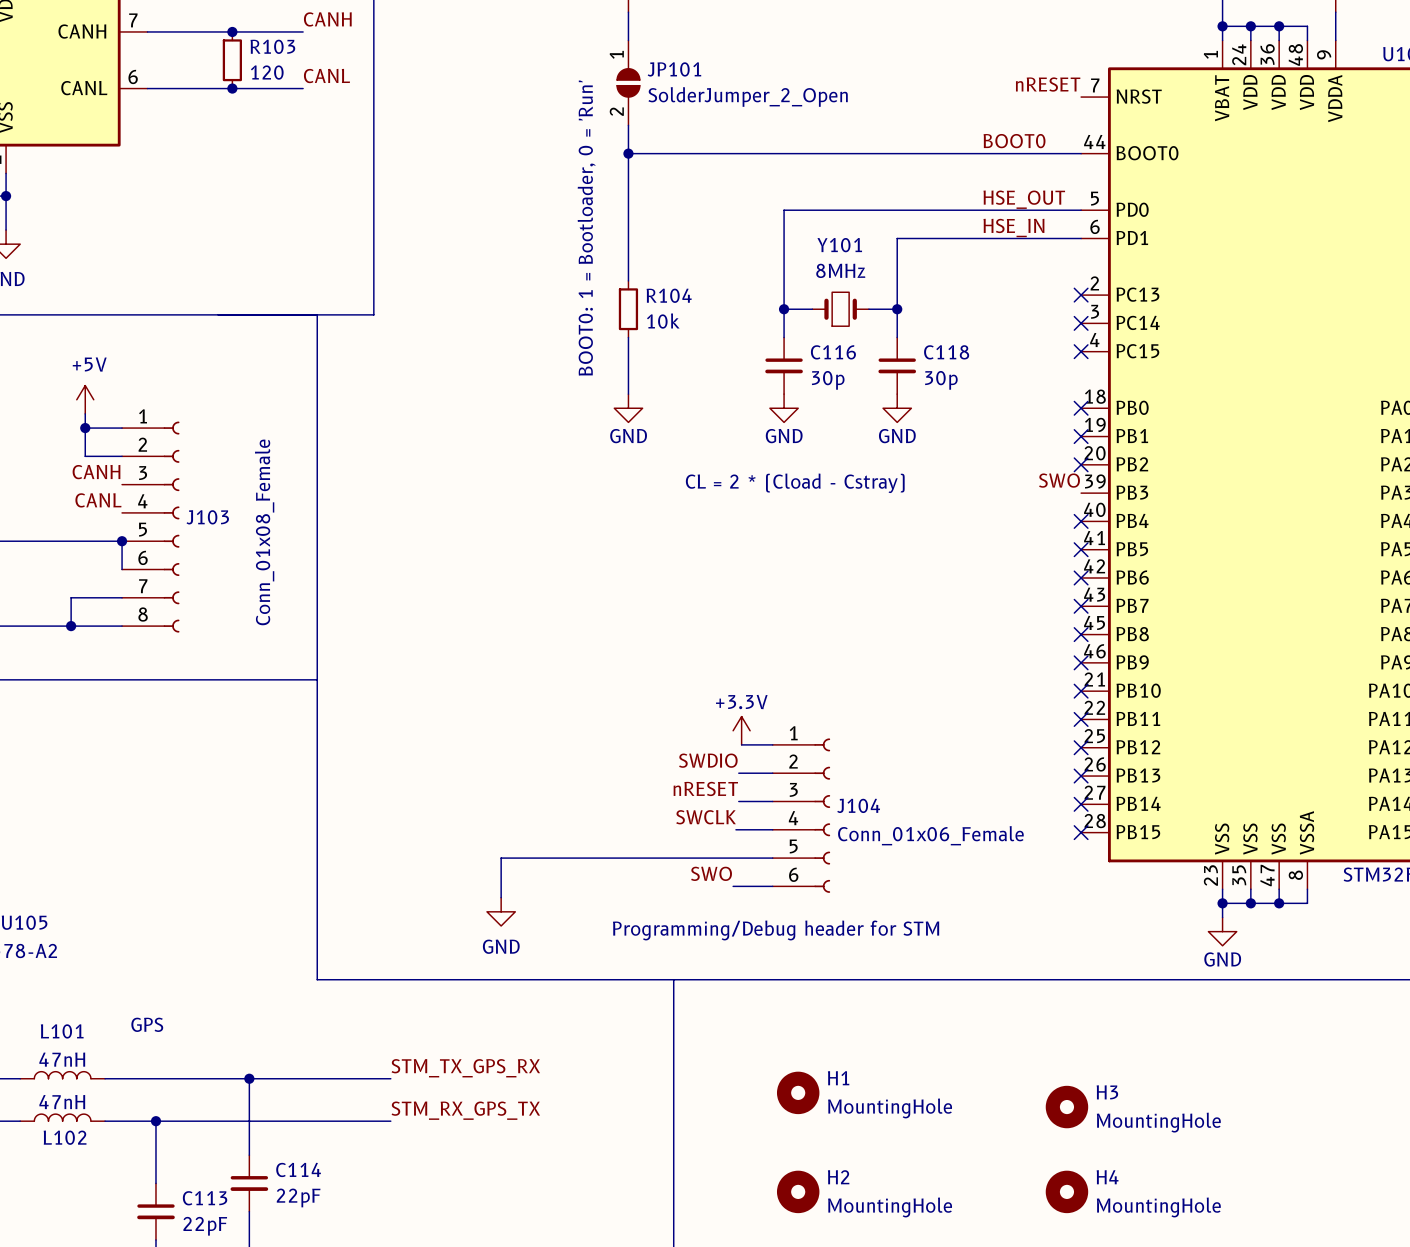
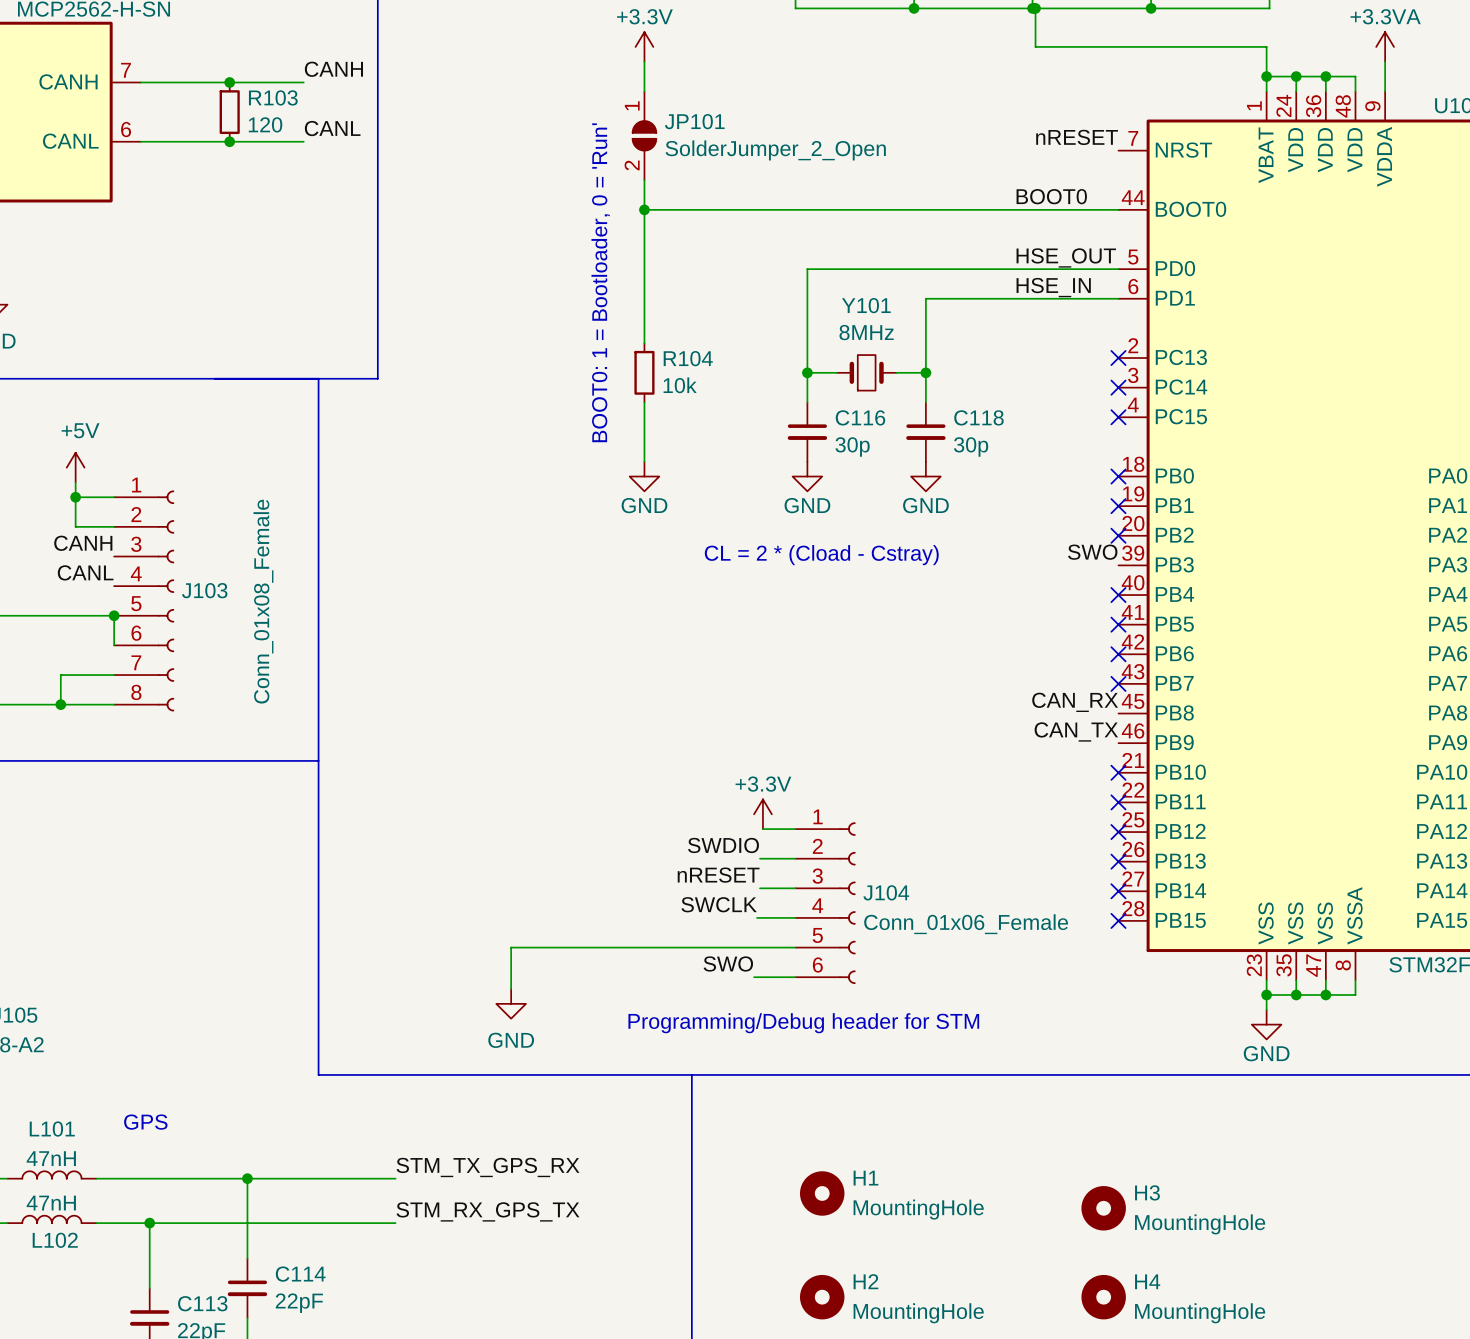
label: none -> CAN_RX (1075, 702)
no-connect mark: (1081, 634) -> none
label: none -> CAN_TX (1076, 731)
no-connect mark: (1081, 662) -> none

